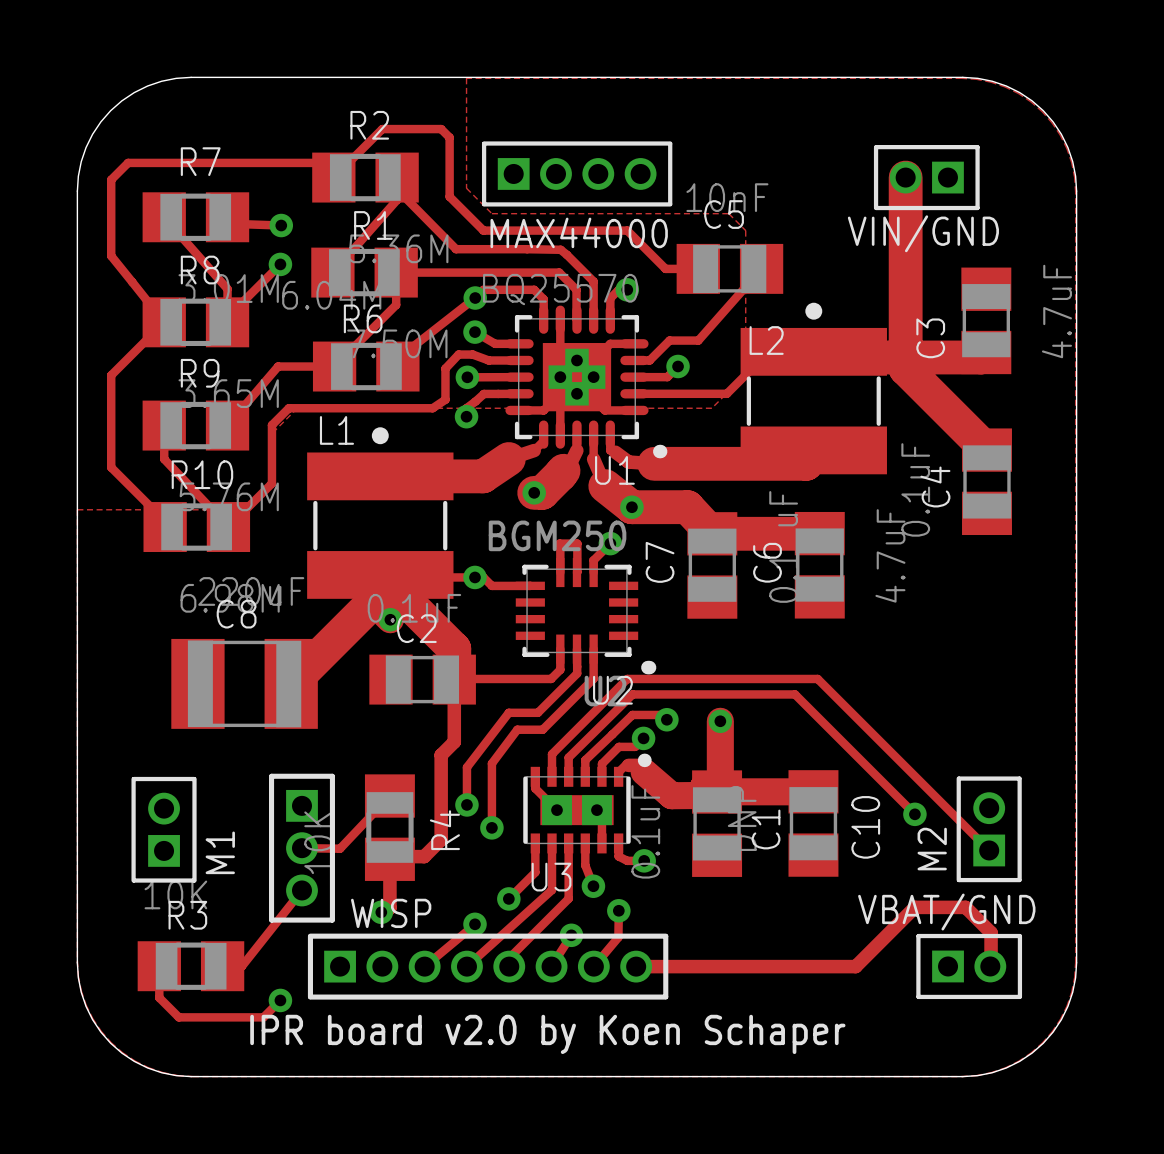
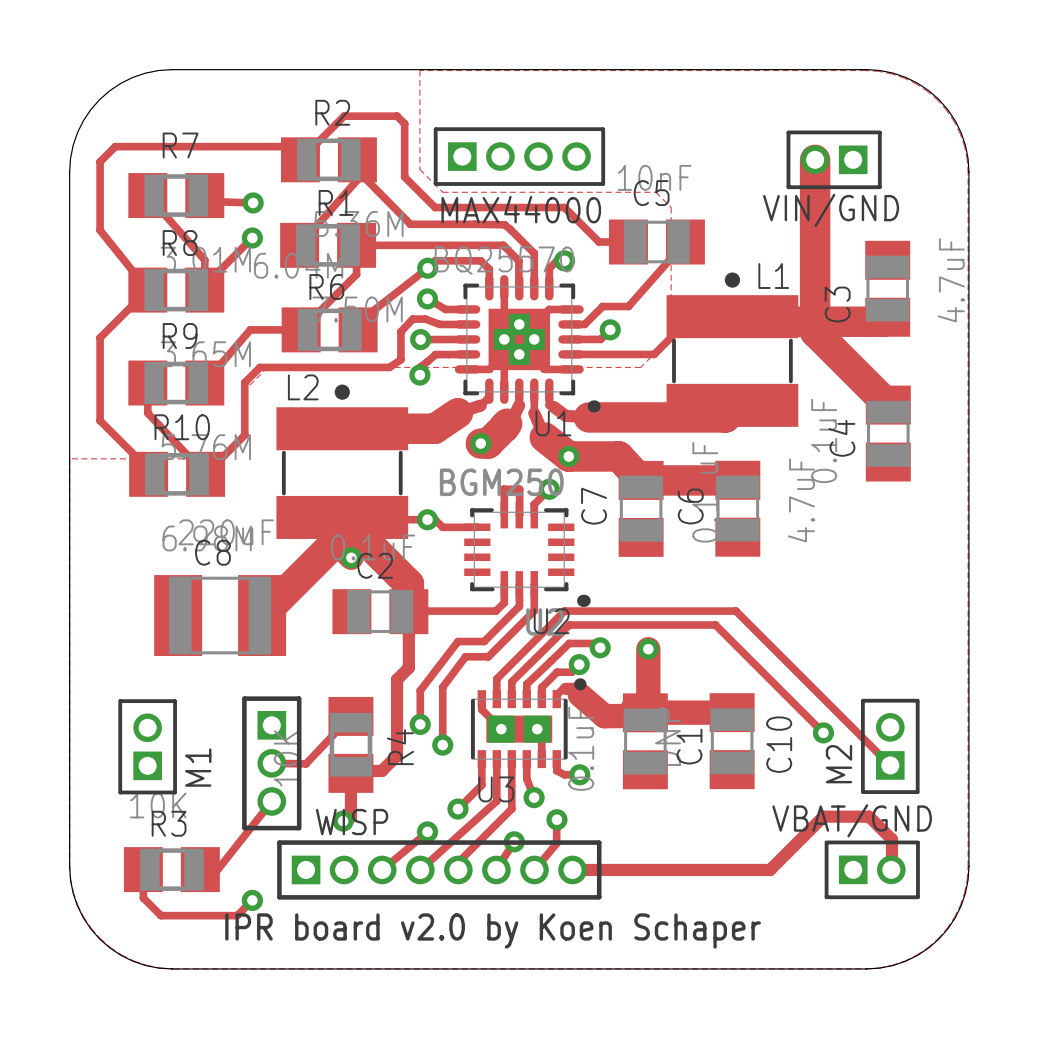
text: none -> L1 (773, 276)
text: L2 (766, 340) -> none
text: L1 (336, 430) -> L2 (303, 387)

